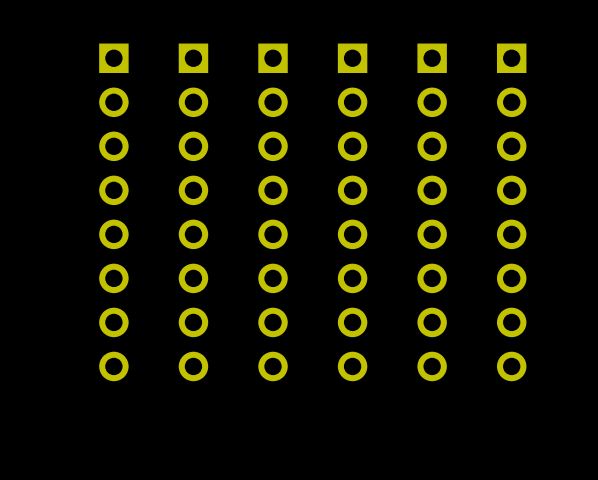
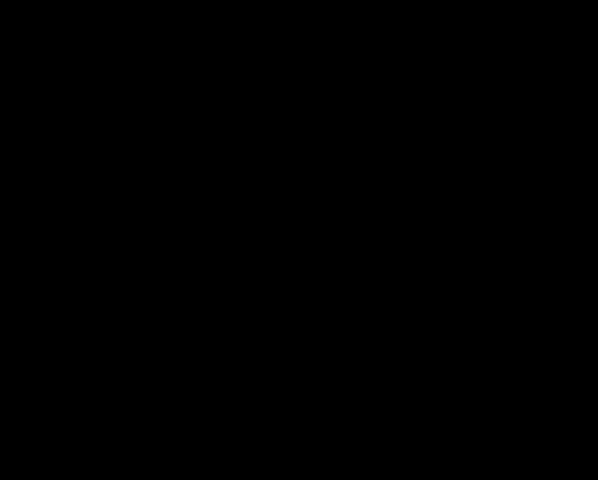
part: (113, 212) -> none
part: (193, 212) -> none
part: (273, 212) -> none
part: (352, 212) -> none
part: (432, 212) -> none
part: (511, 212) -> none

